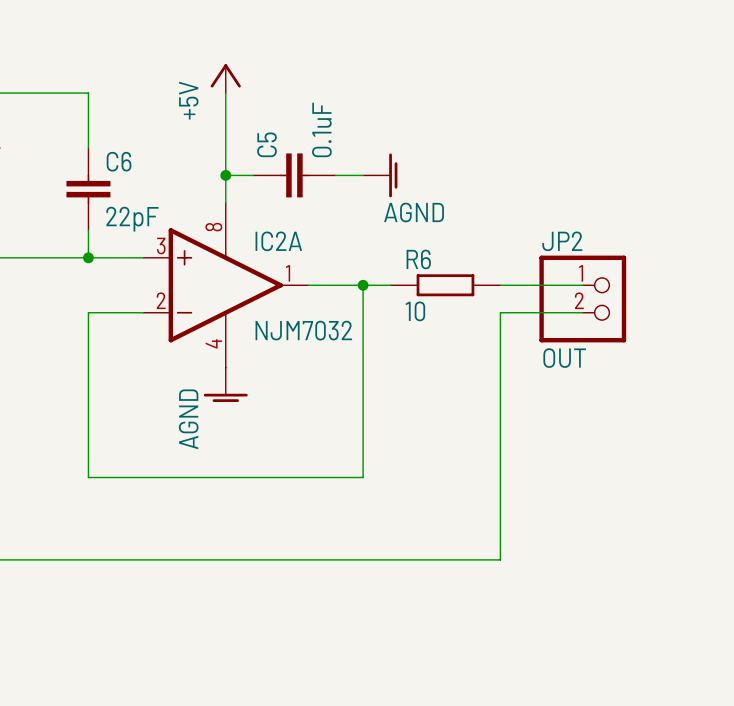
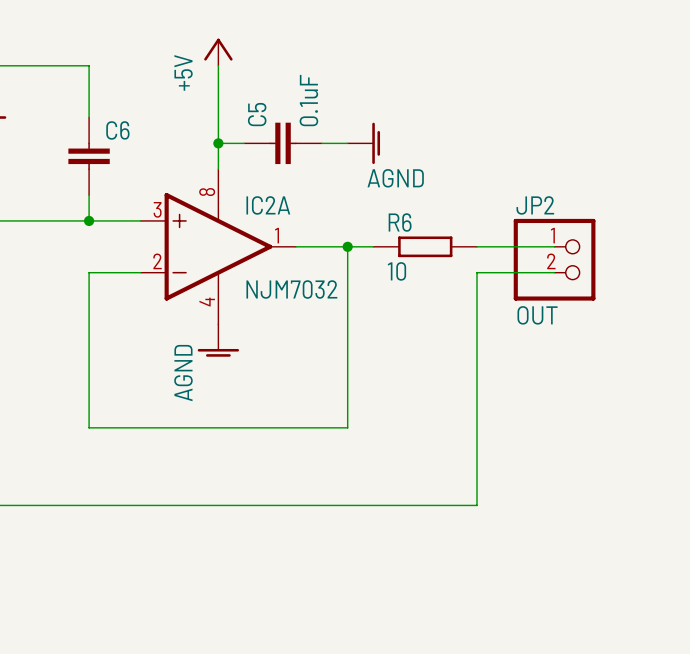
C6 value: 22pF (132, 219) -> none

